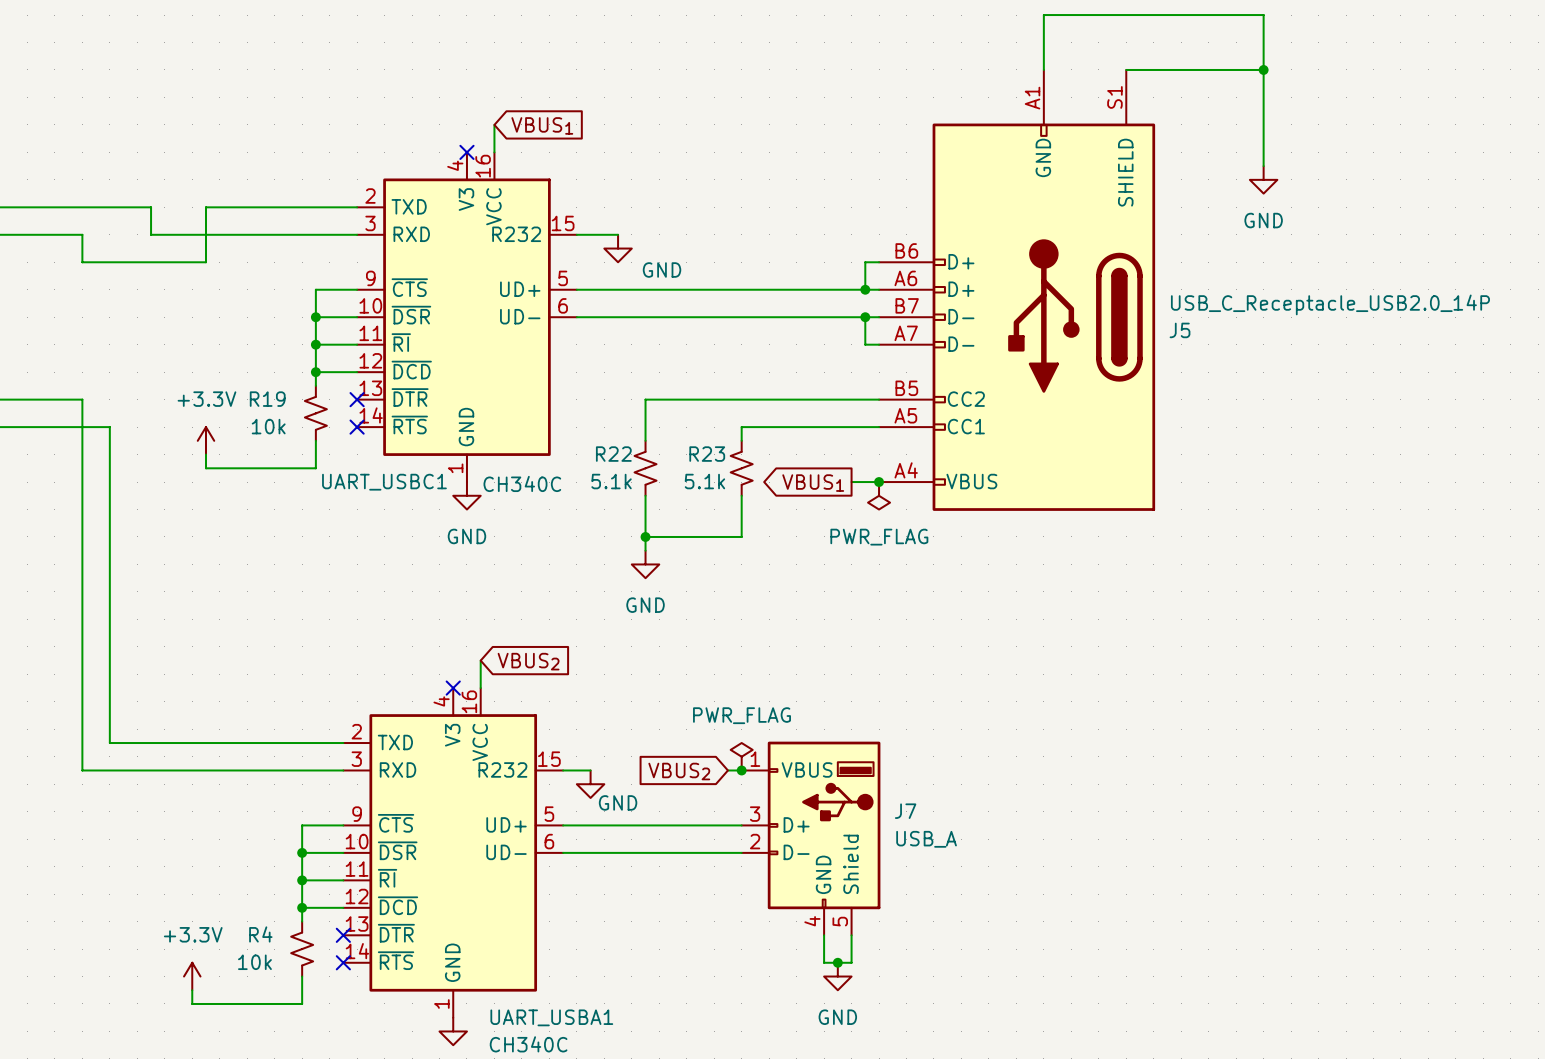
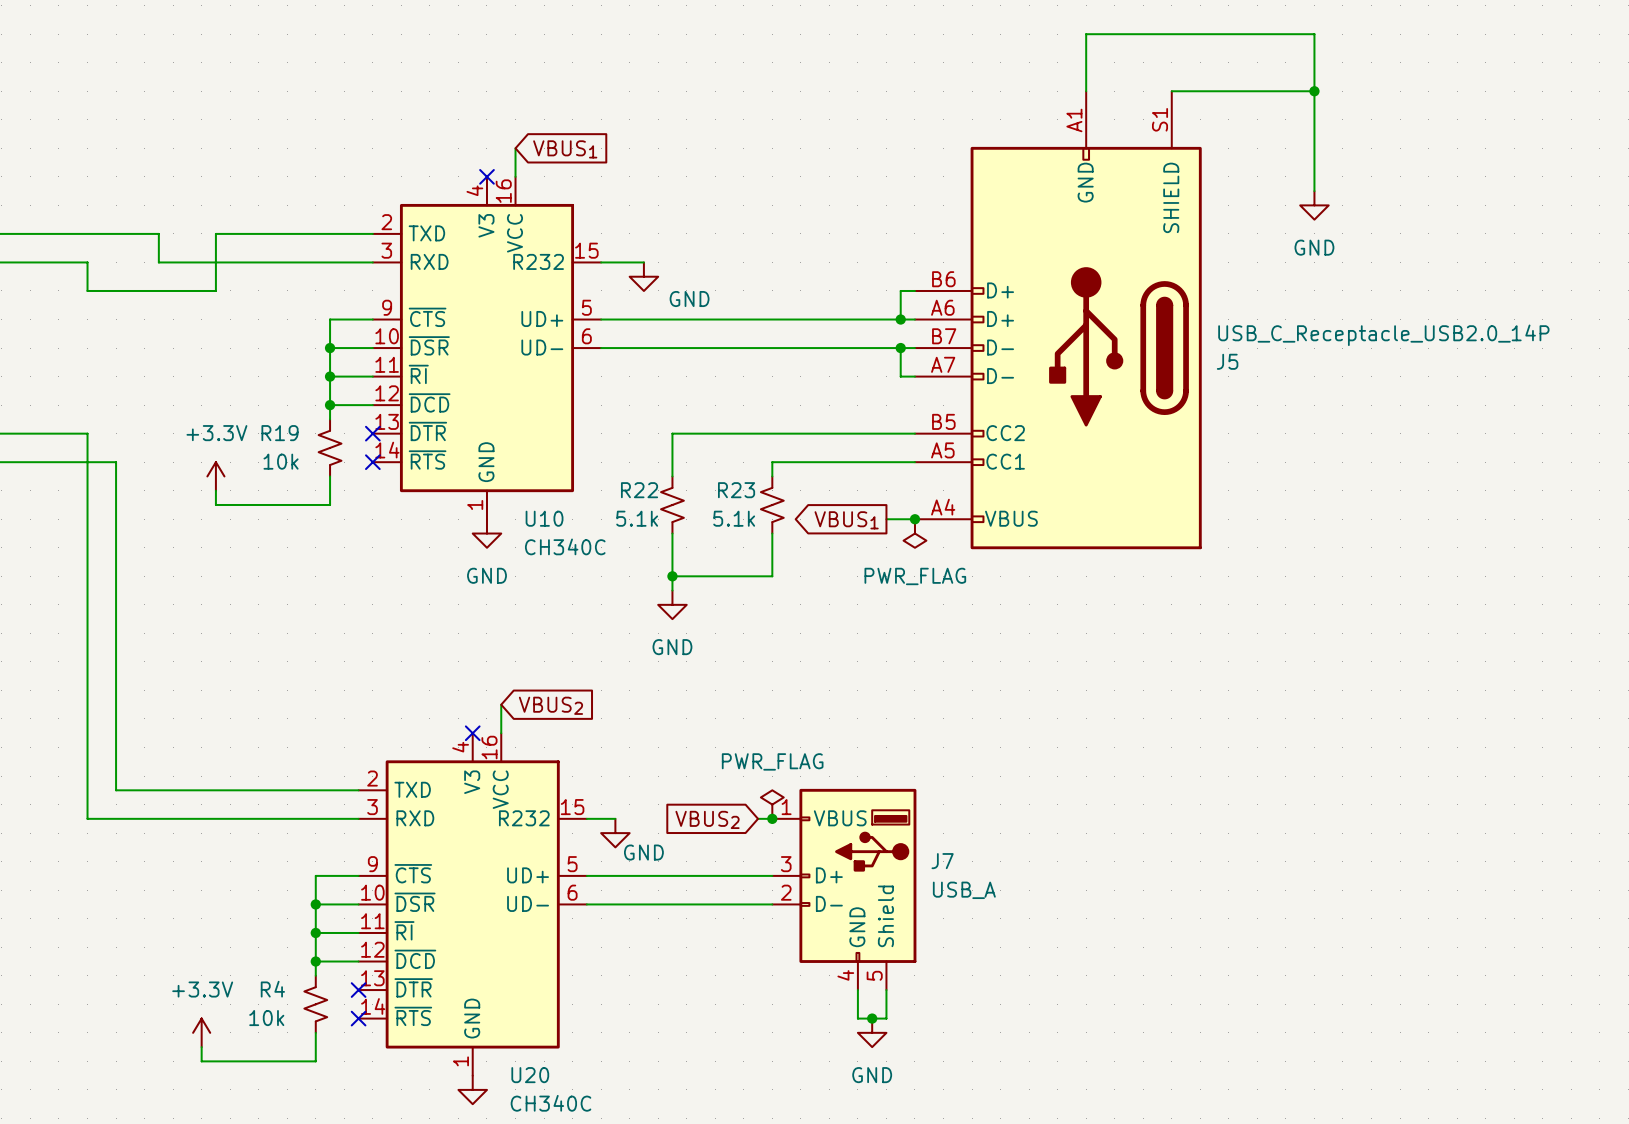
UART_USBC1 name: UART_USBC1 (384, 482) -> U10 (544, 518)
UART_USBC1 value position: CH340C (522, 483) -> CH340C (565, 546)
UART_USBA1 name: UART_USBA1 (551, 1017) -> U20 (530, 1075)

